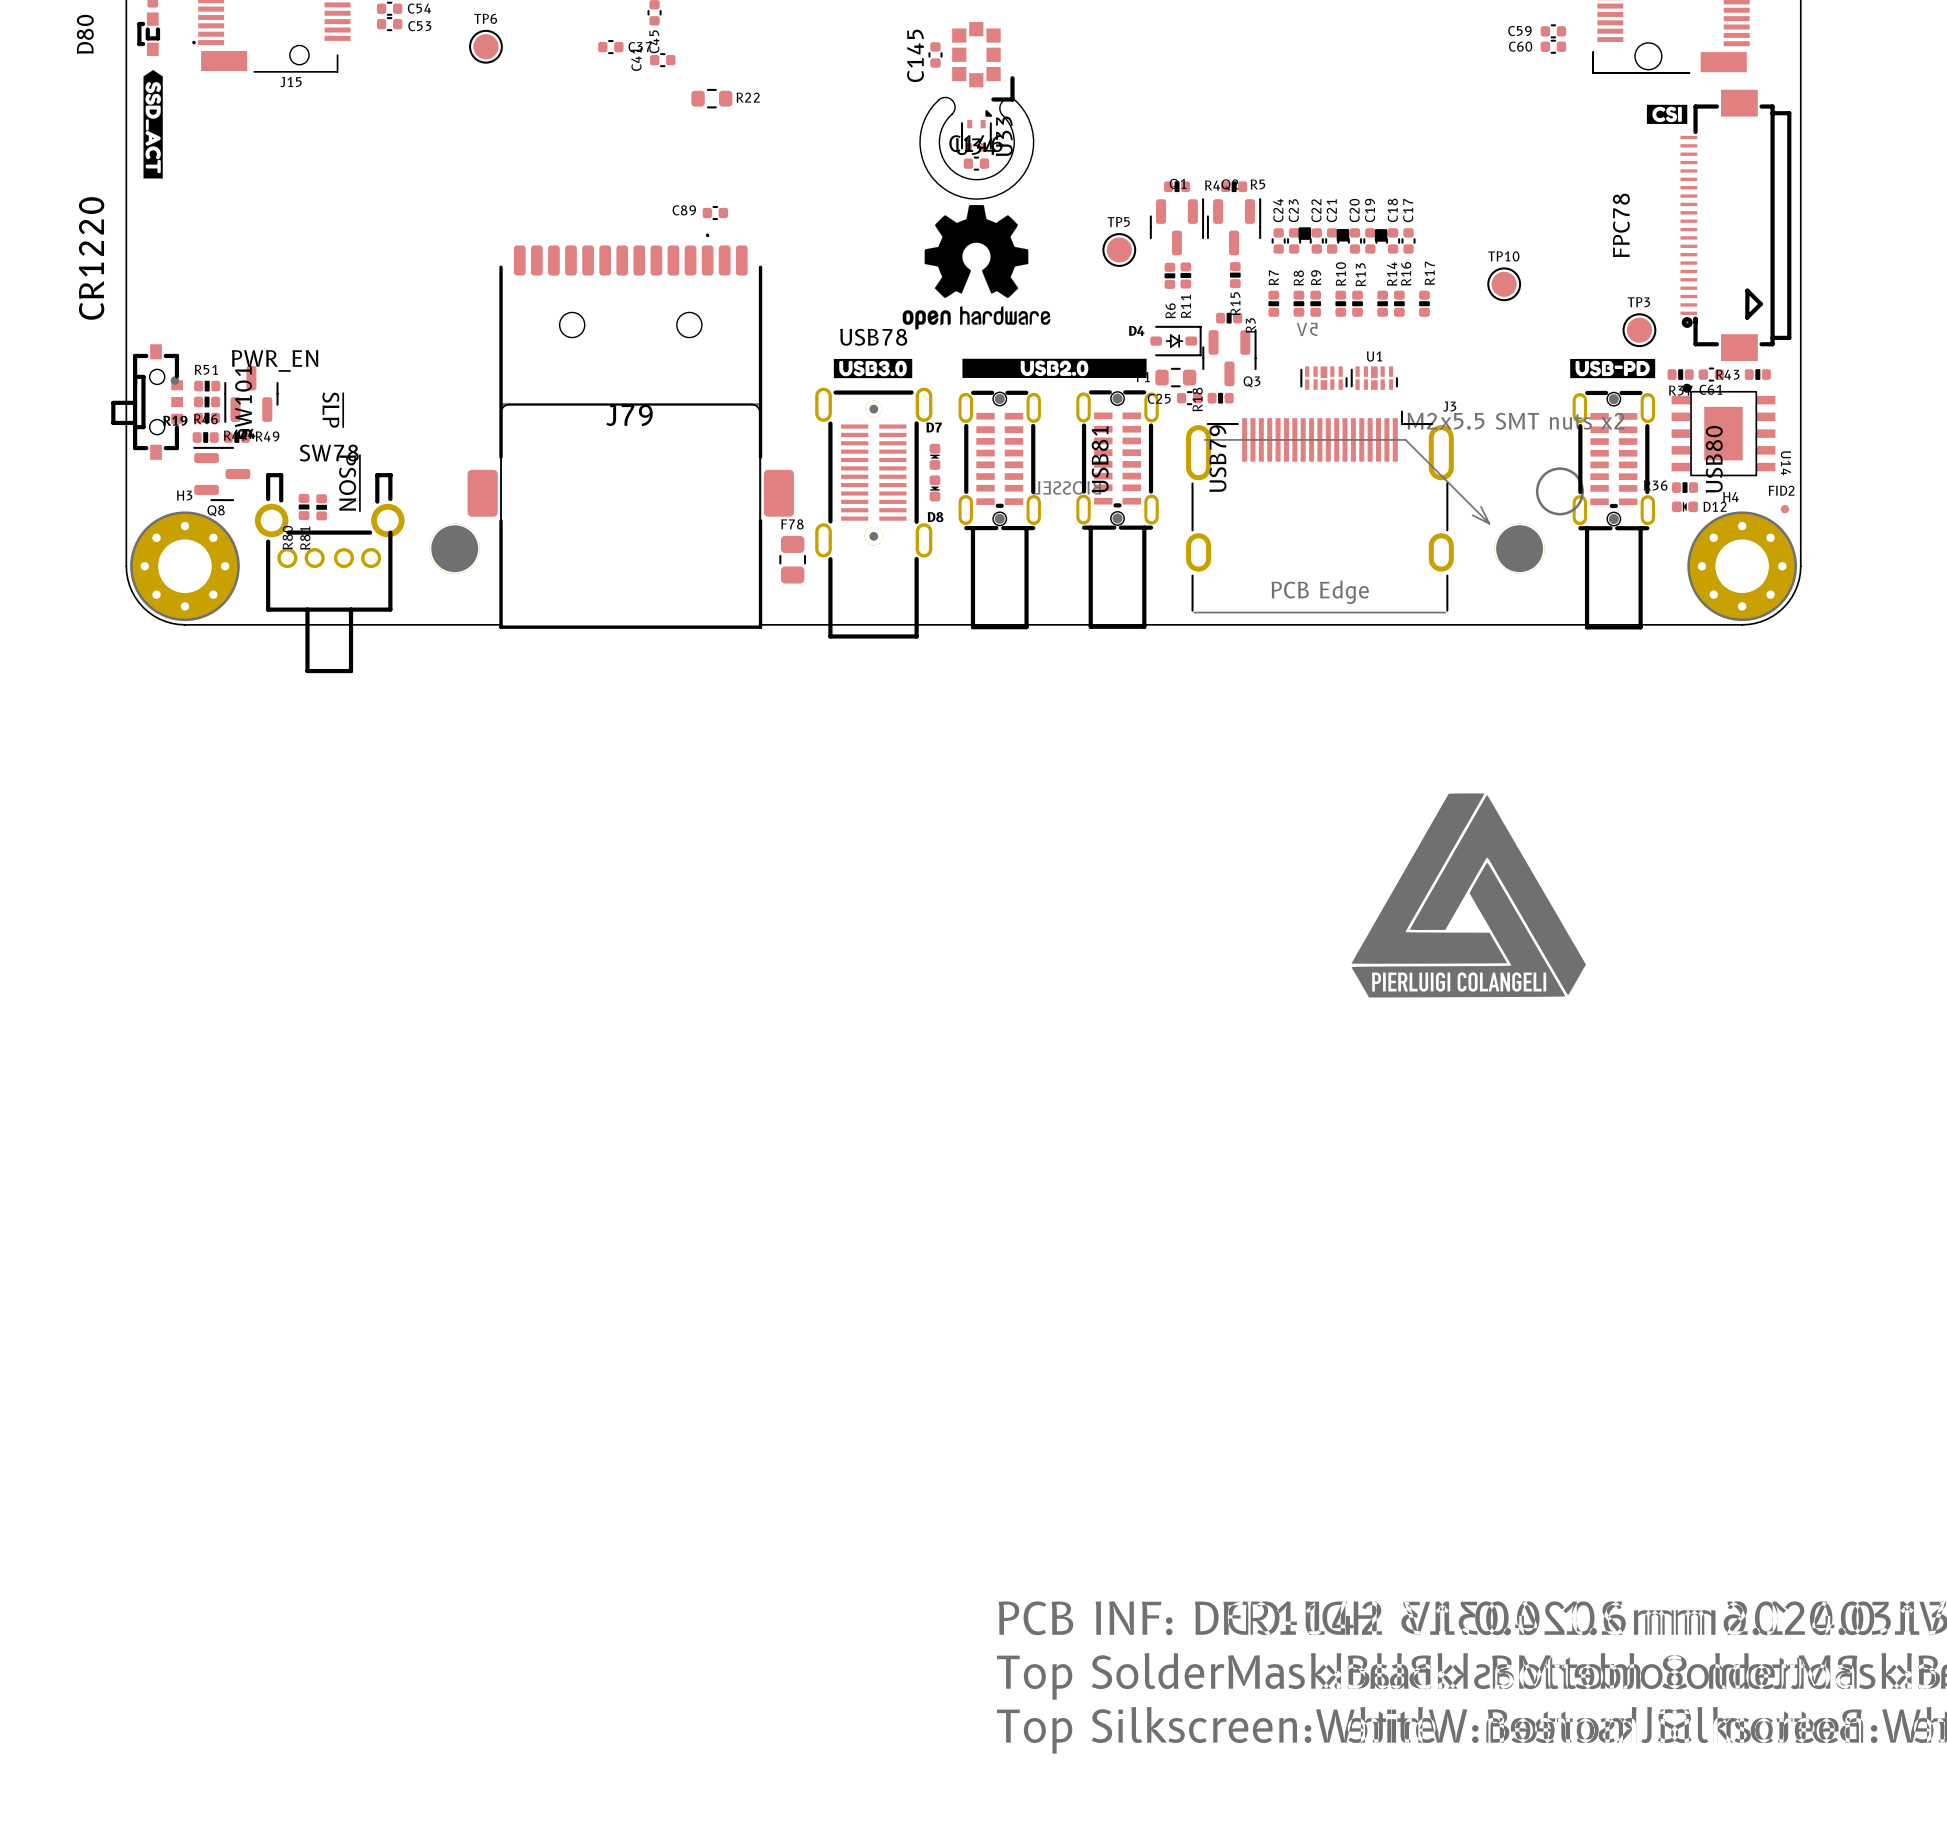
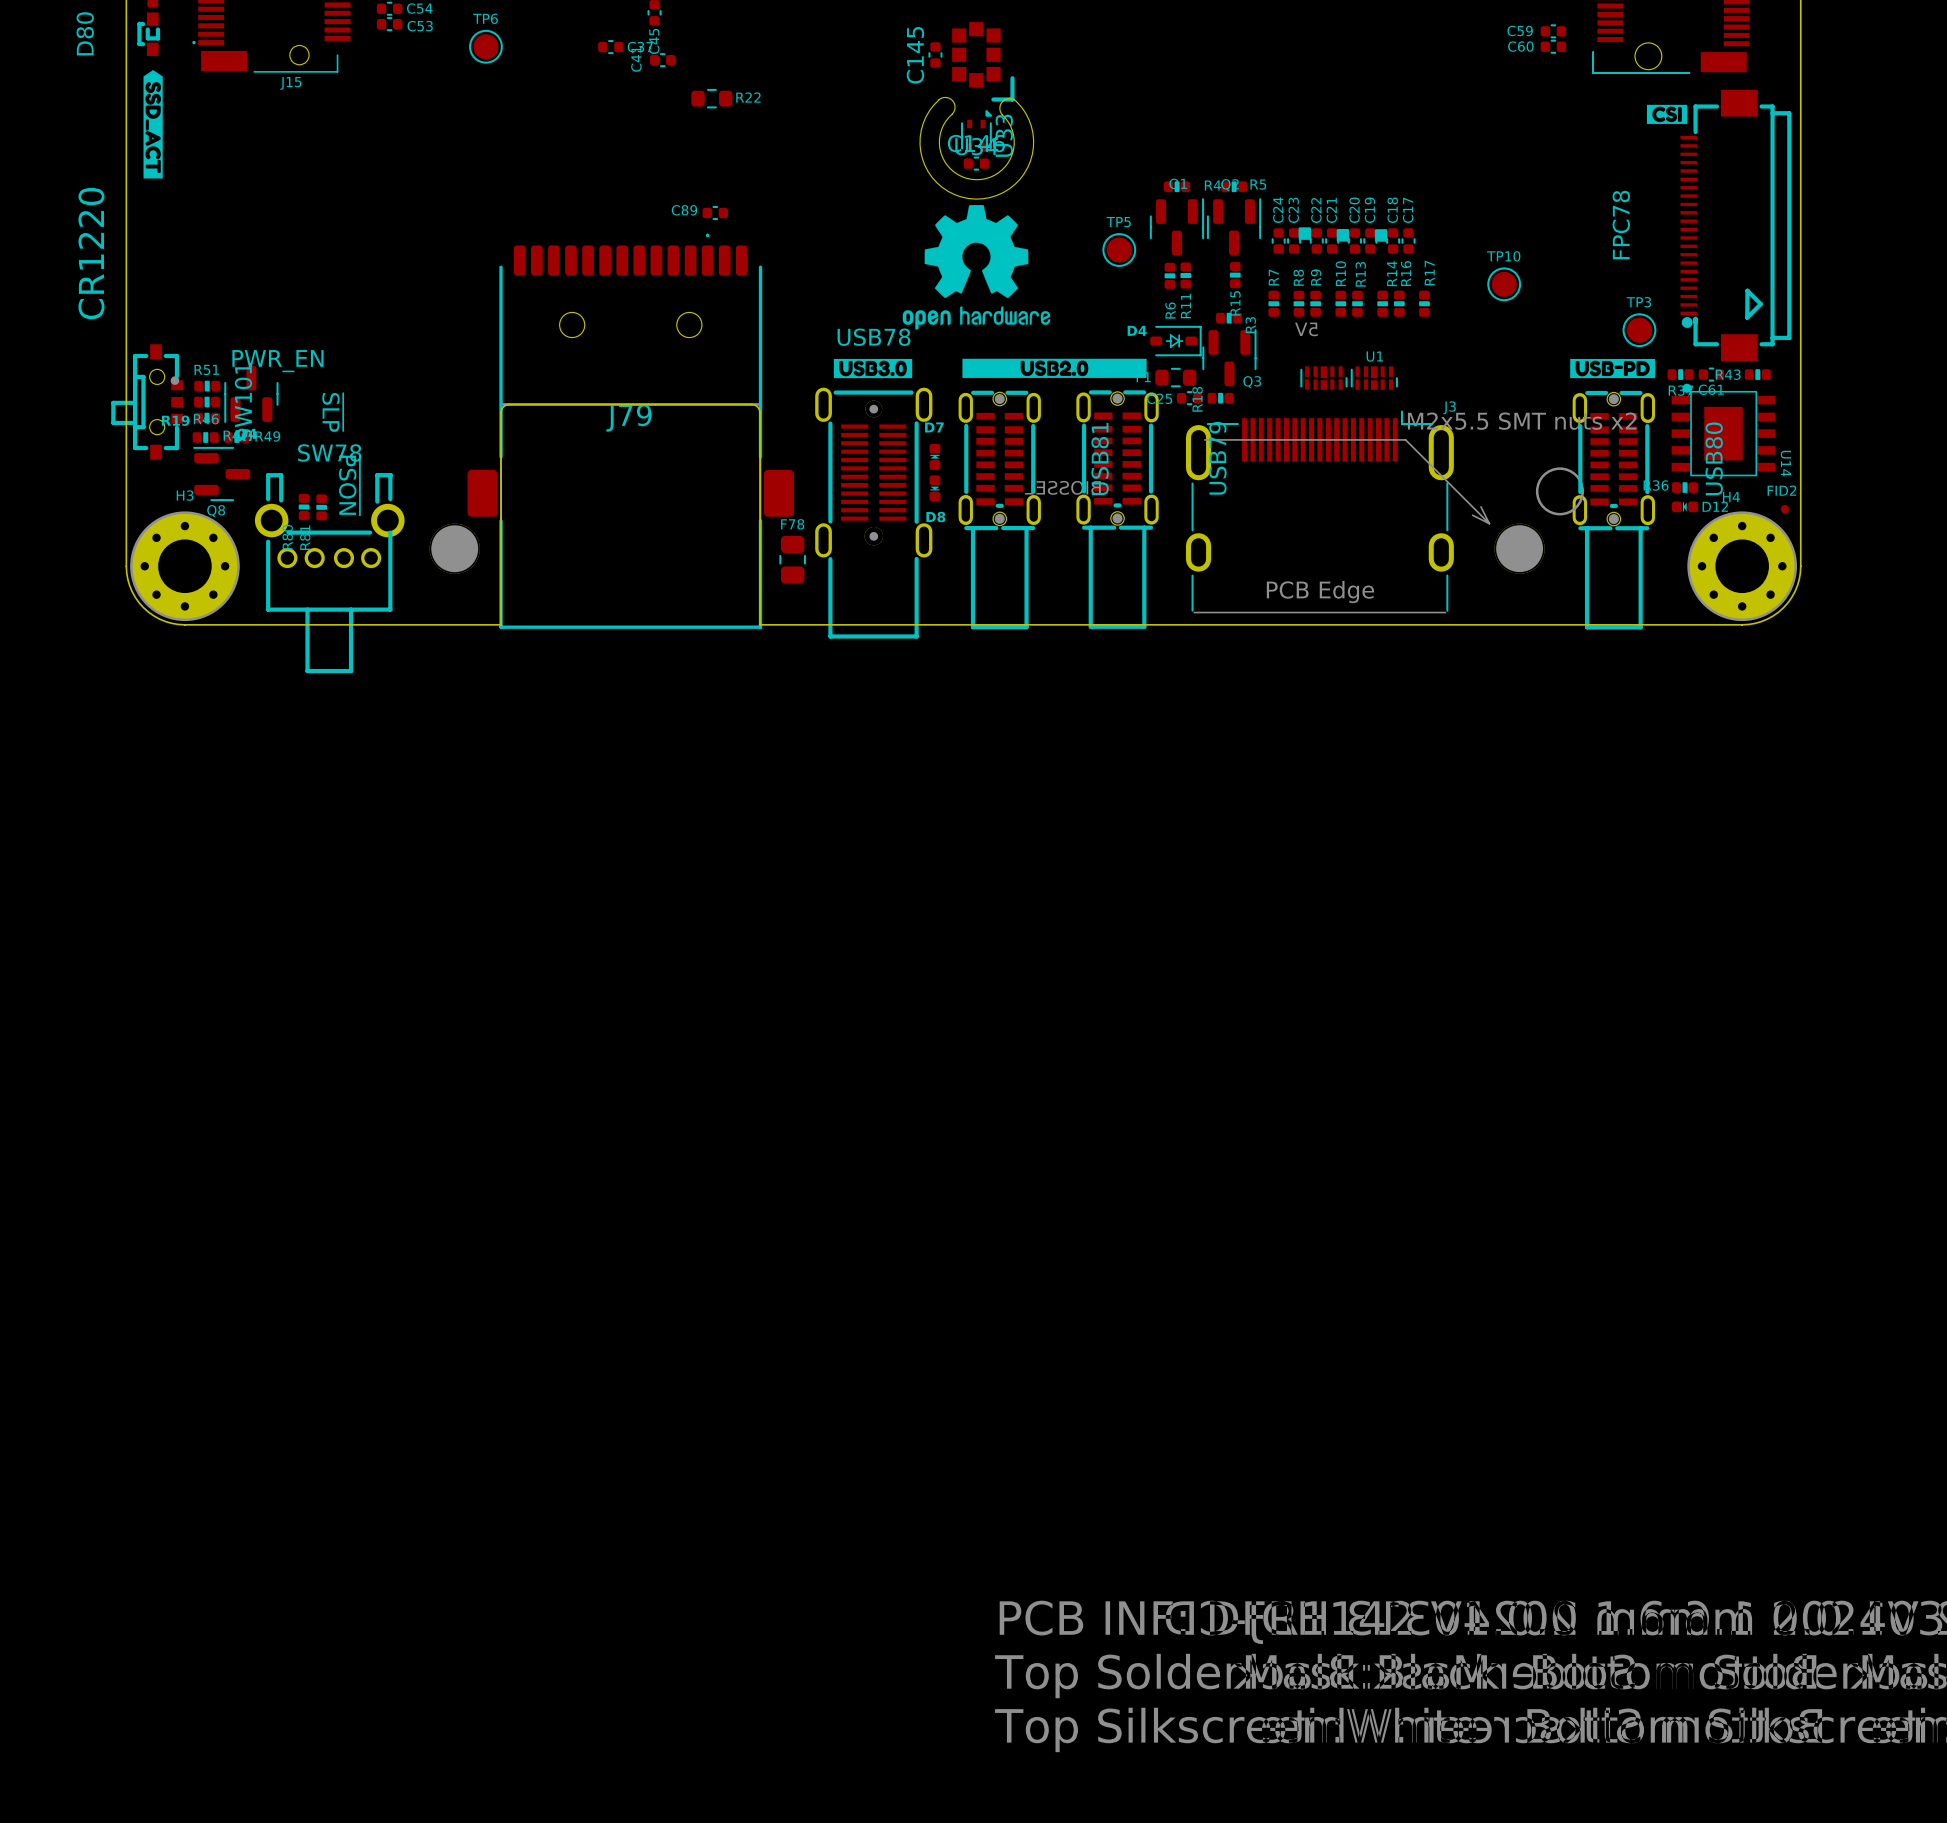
drawing: [1351, 793, 1586, 998] -> none

